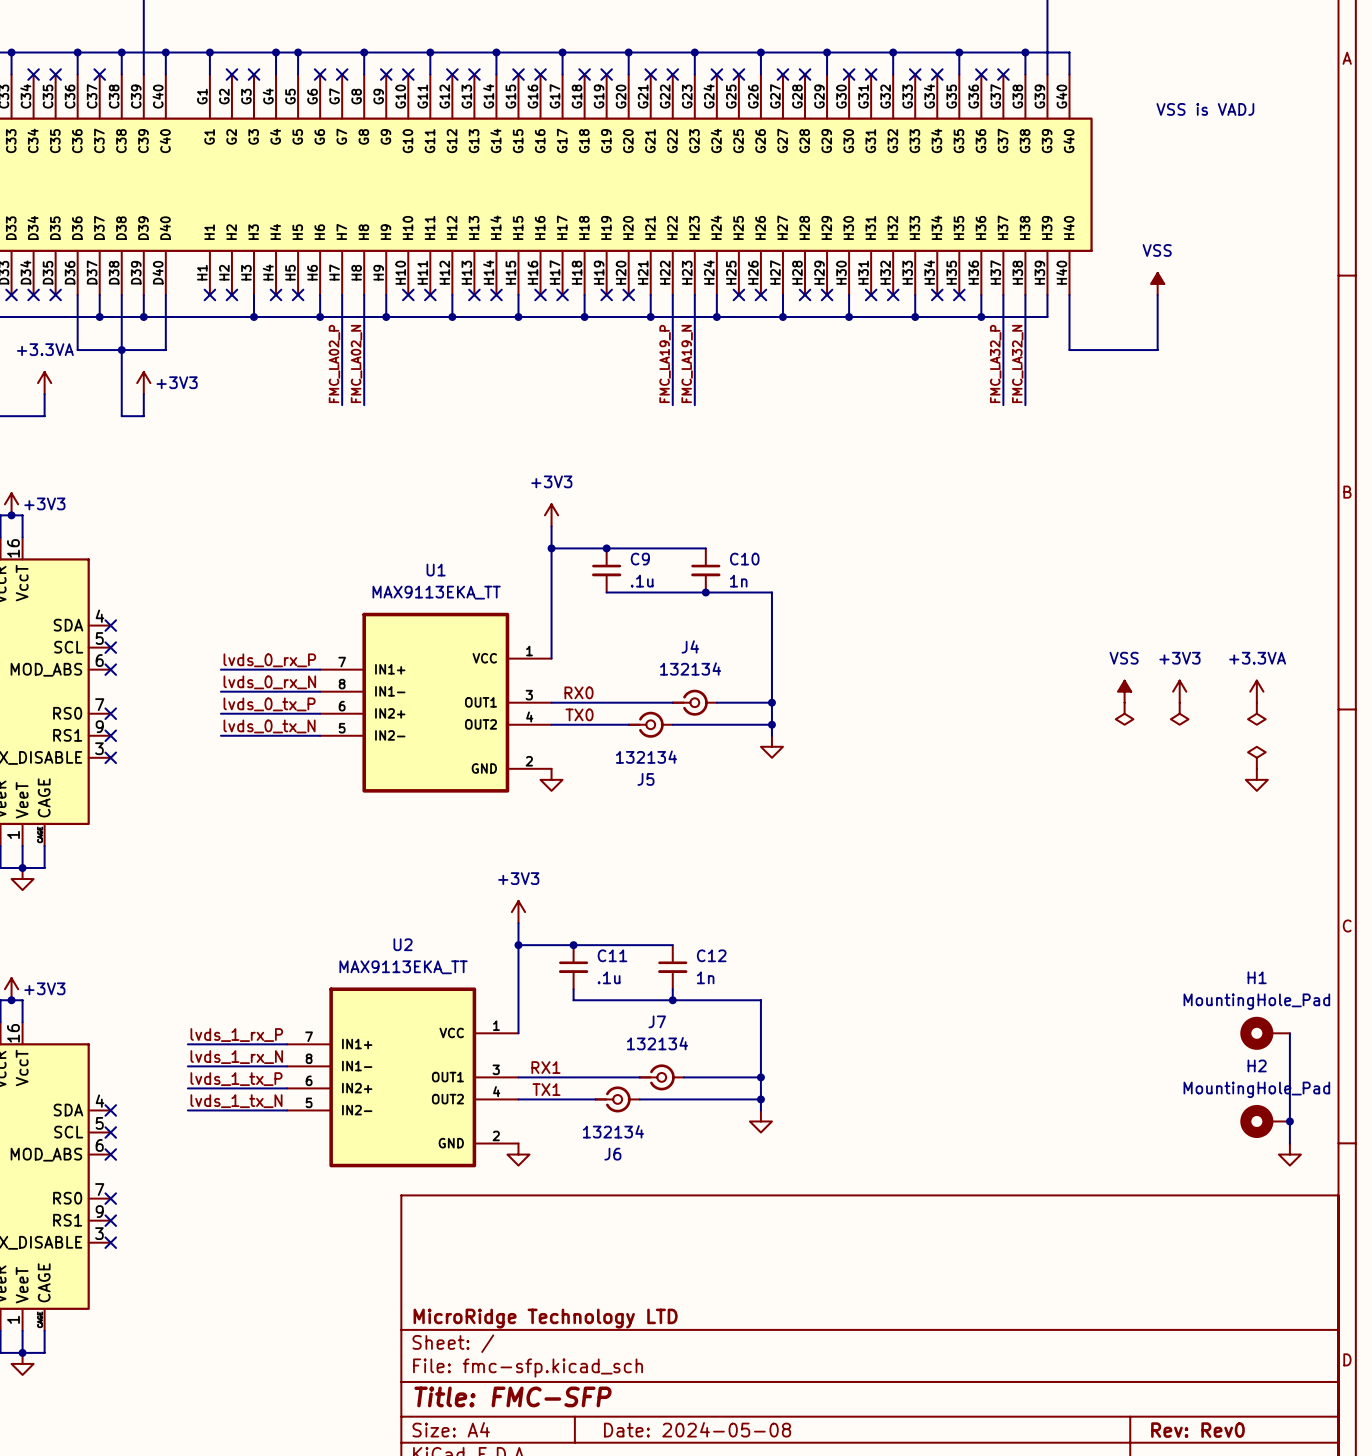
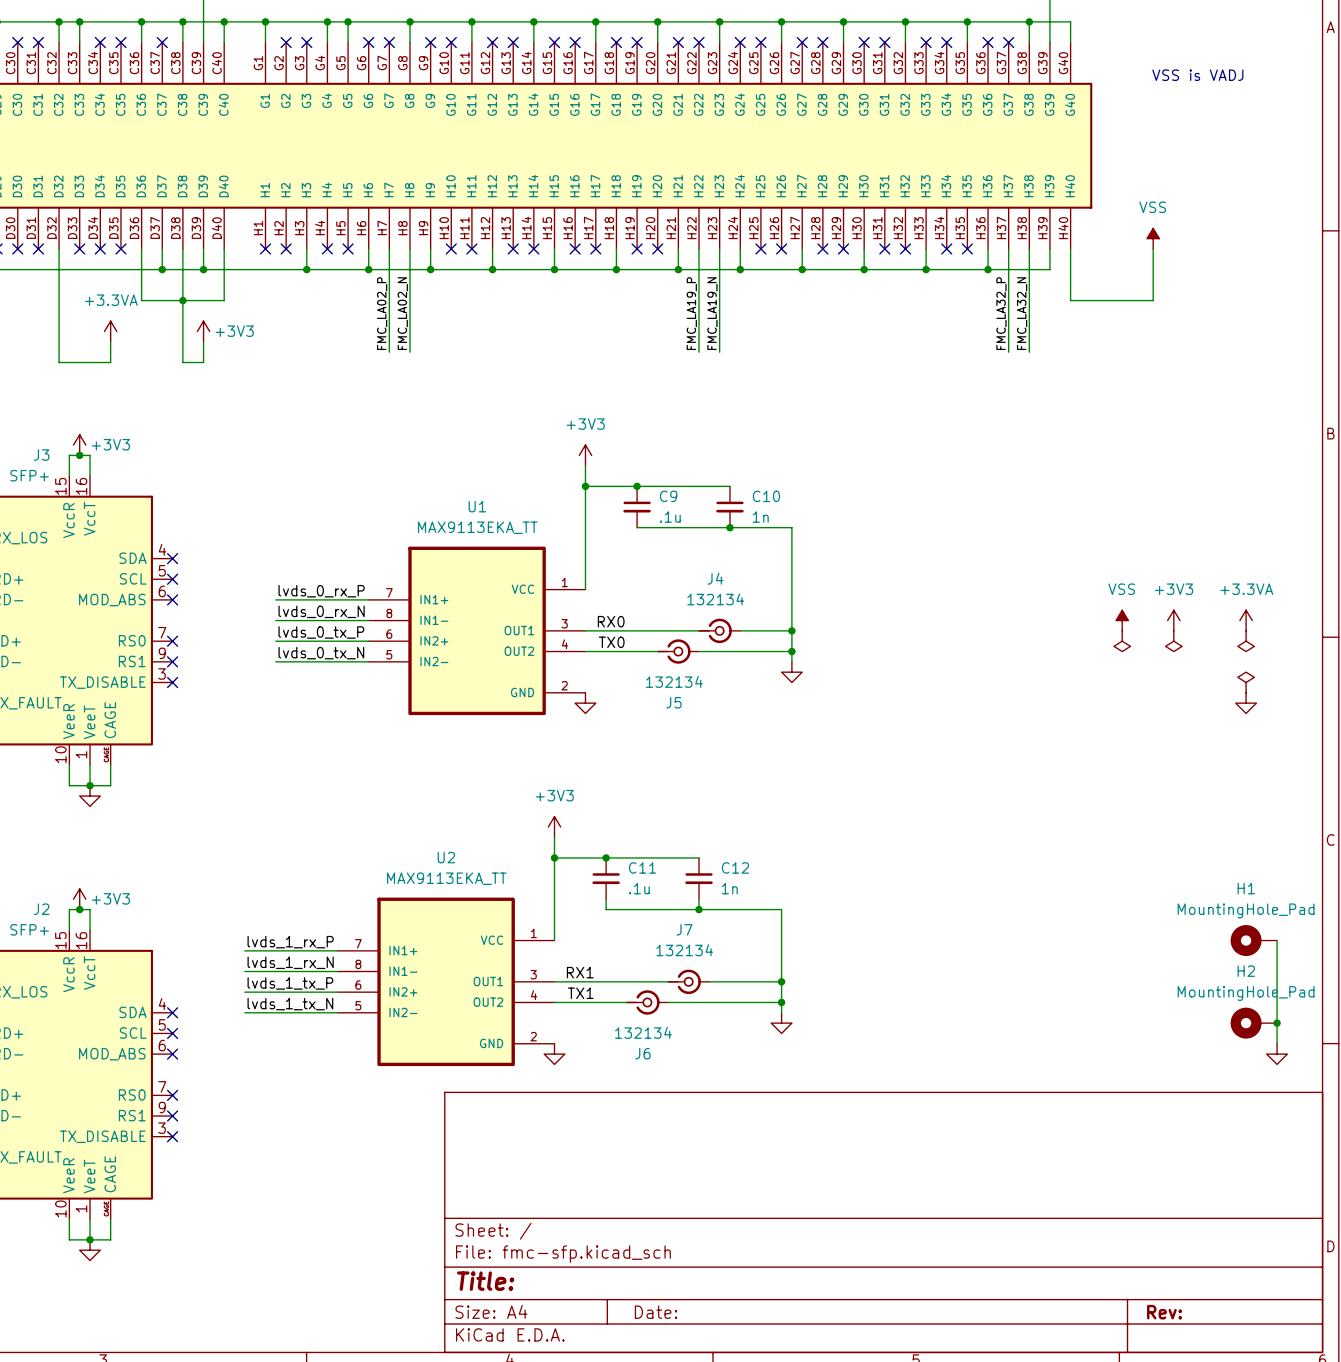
title block: MicroRidge Technology LTD (545, 1318) -> none
title block: Title: FMC-SFP (513, 1396) -> Title: (485, 1281)
title block: Date: 2024-05-08 (697, 1429) -> Date: (656, 1312)
title block: Rev: Rev0 (1197, 1430) -> Rev: (1164, 1312)

